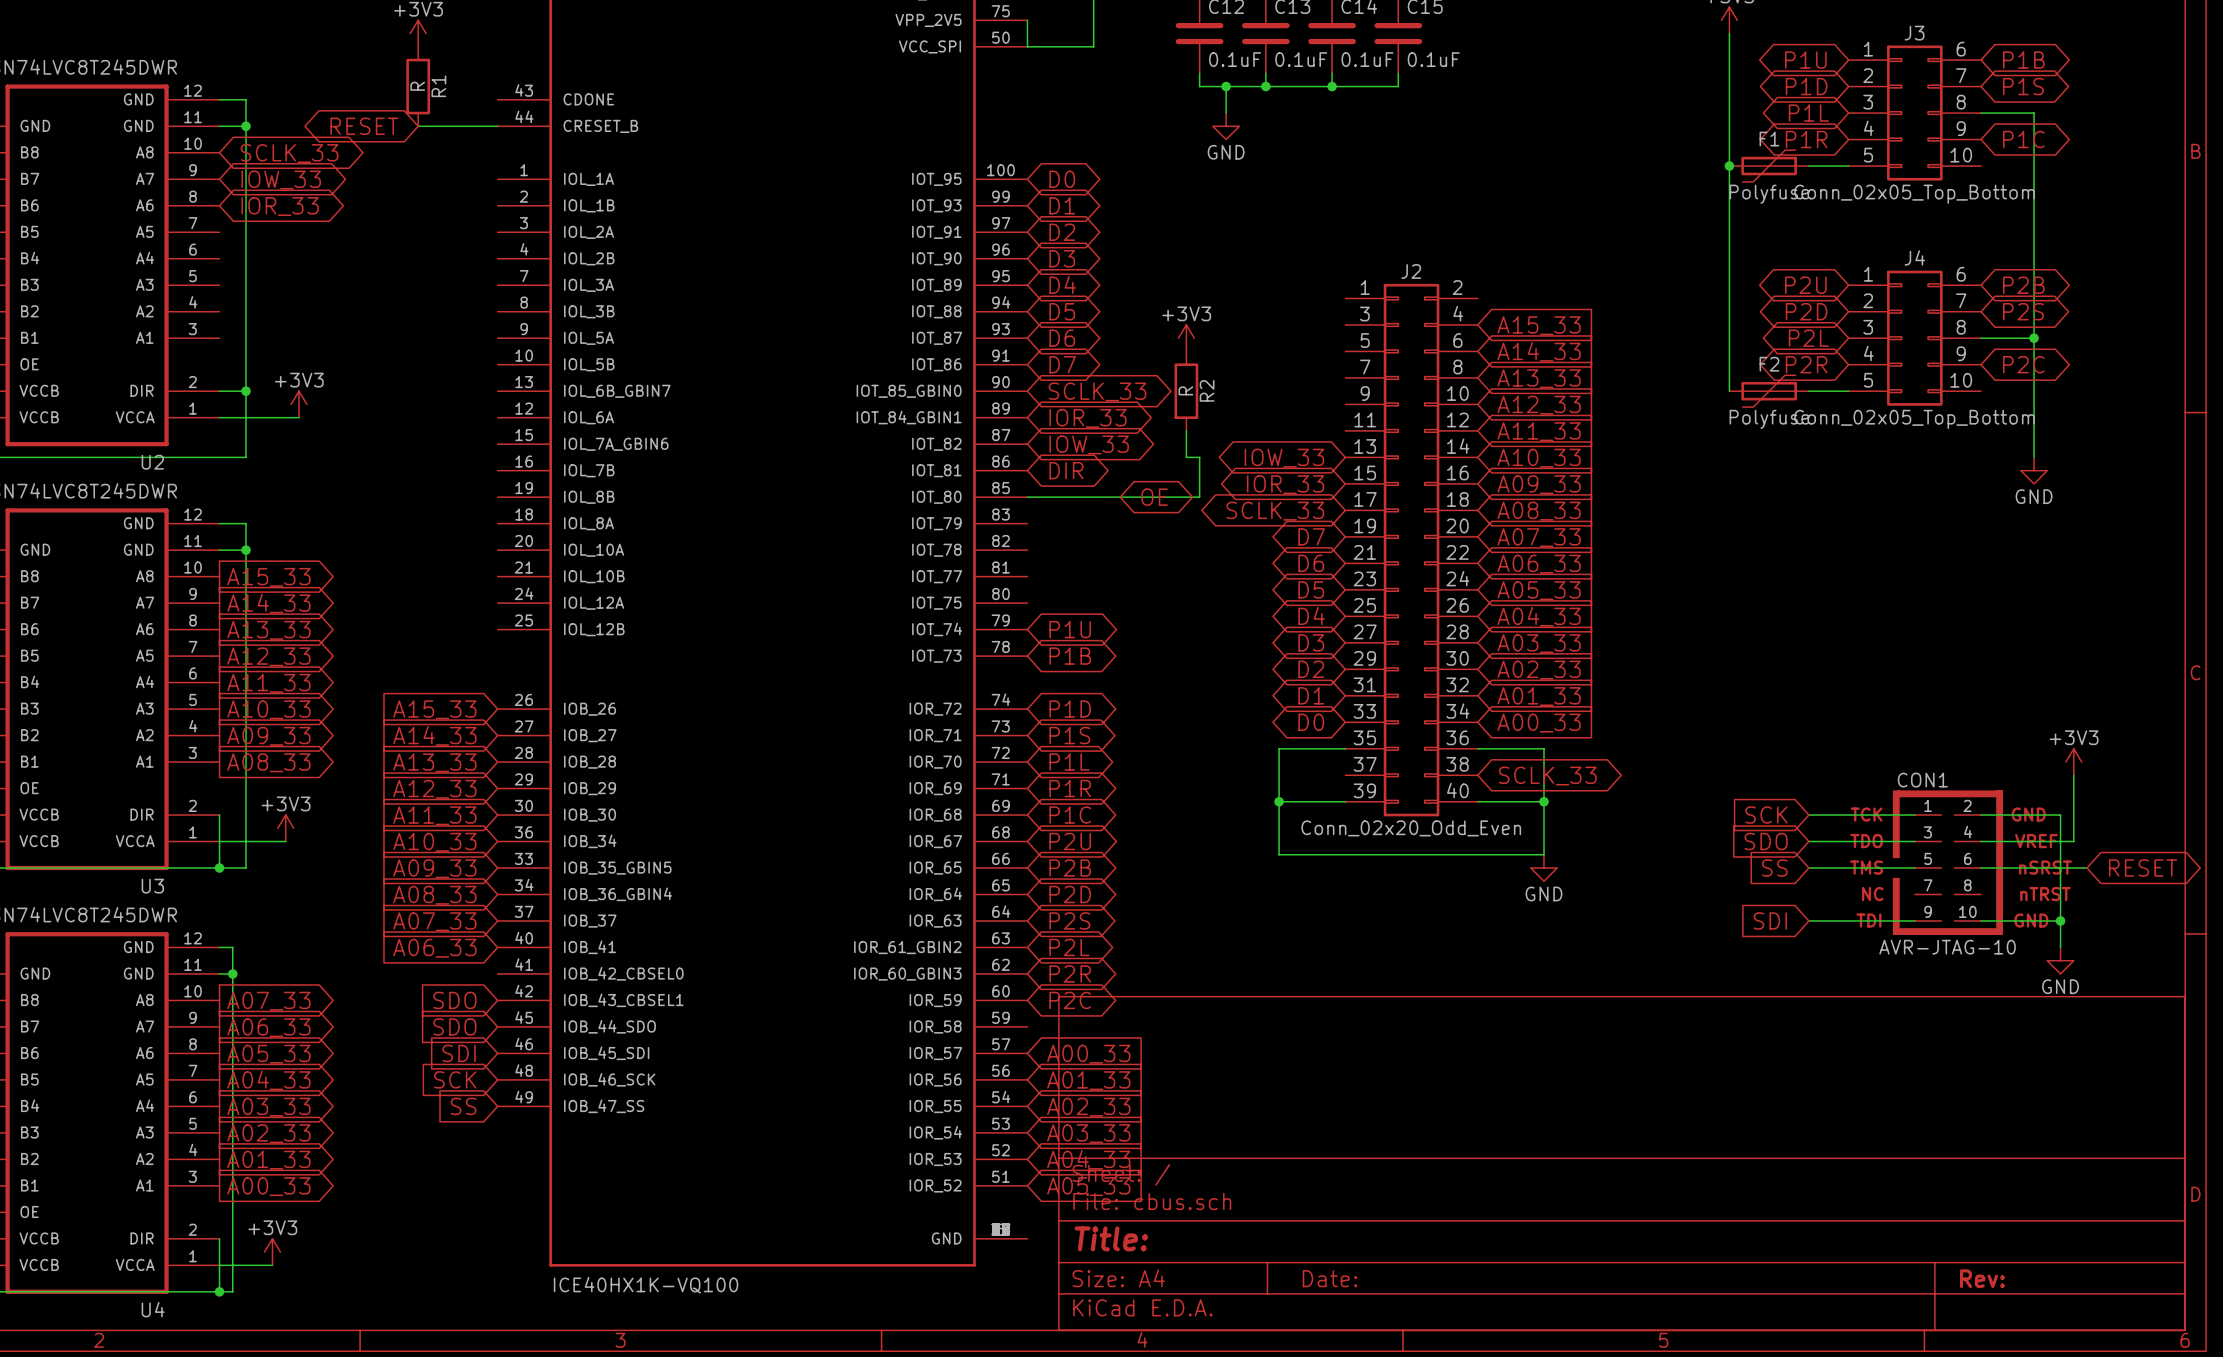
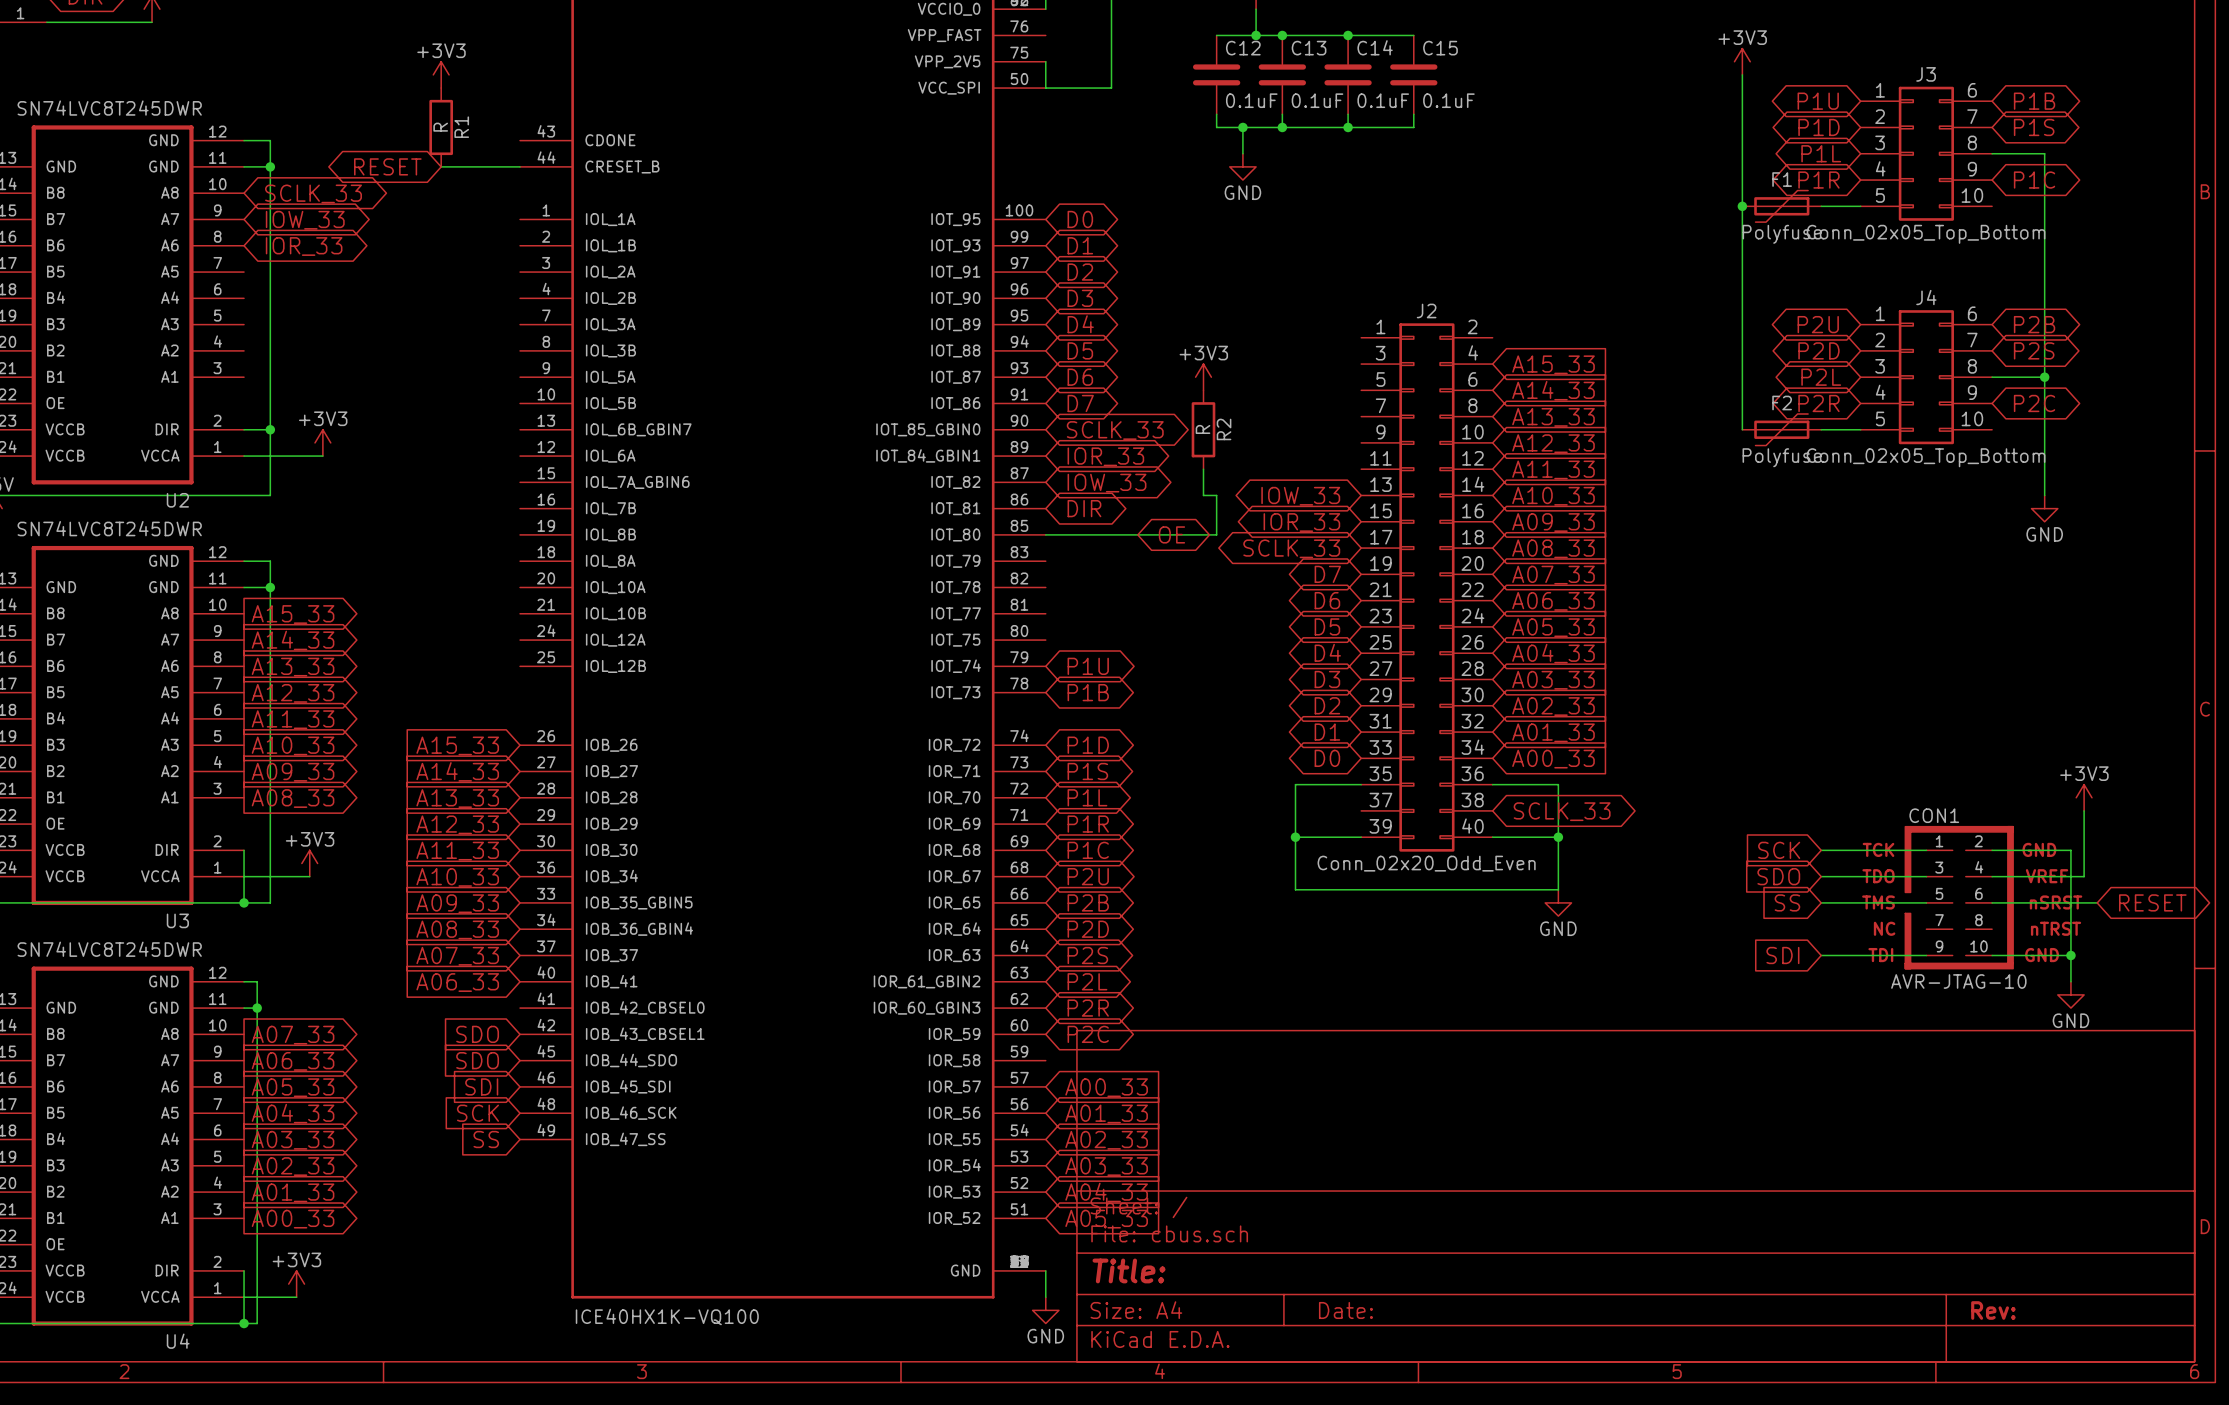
wire: none -> (1045, 1270) (1045, 1297)
power symbol: none -> GND (1045, 1310)

